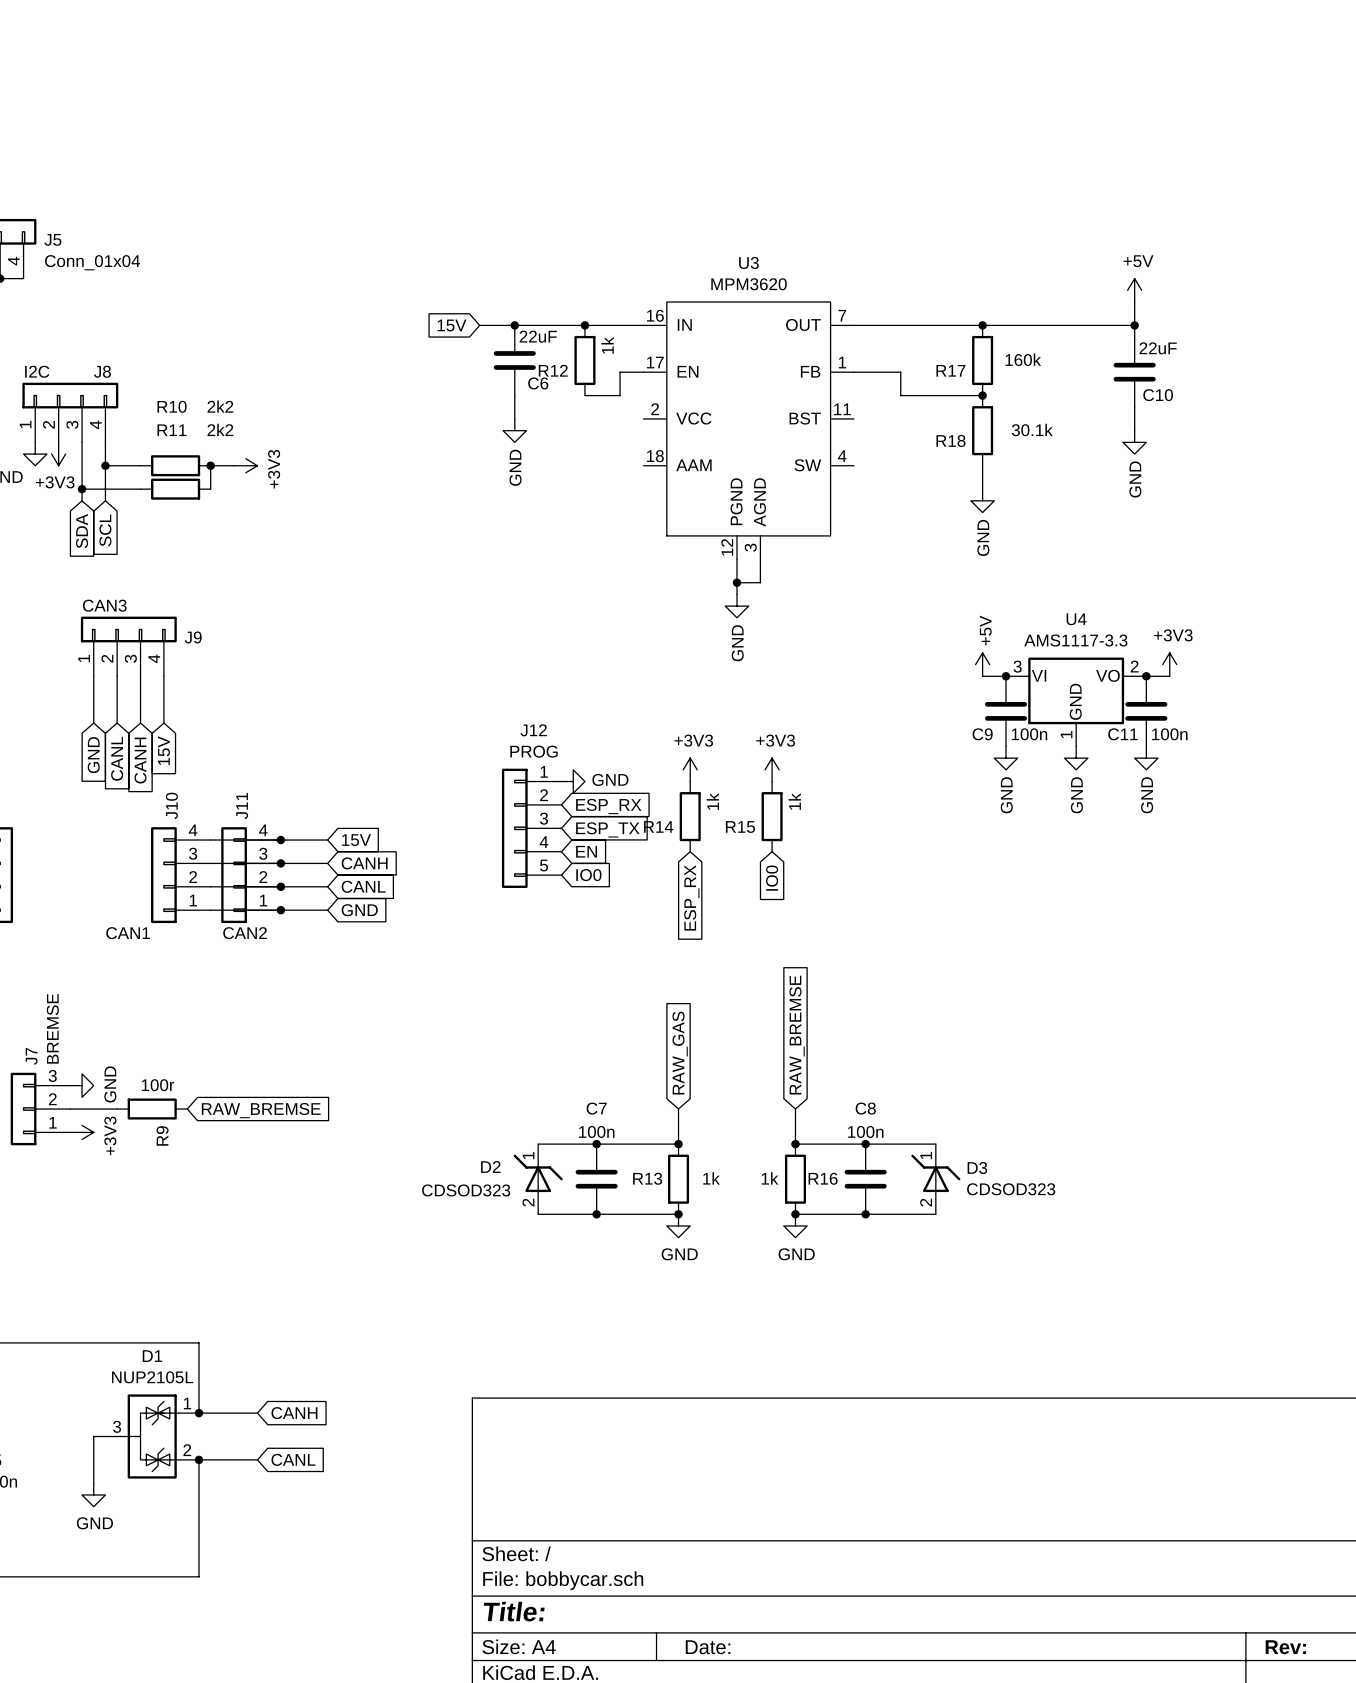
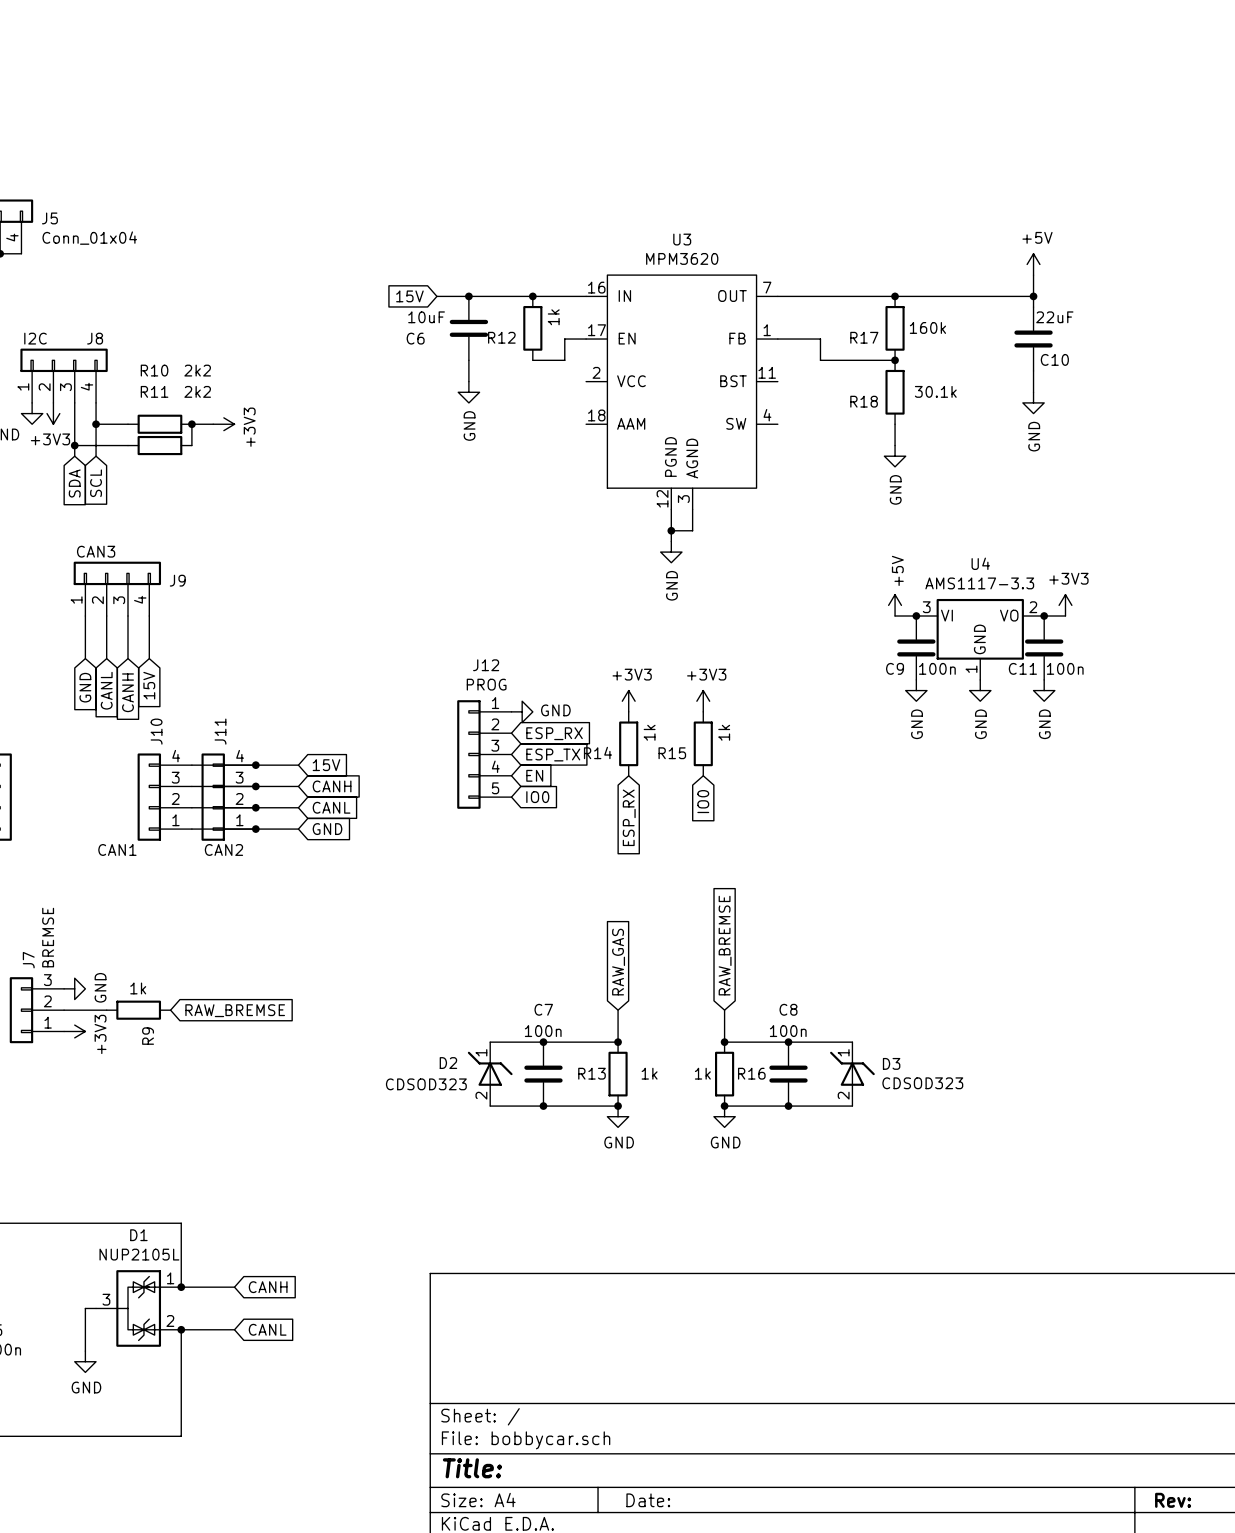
C6 value: 22uF (538, 336) -> 10uF (426, 317)
C6 name position: C6 (538, 383) -> C6 (415, 338)
R9 value: 100r (158, 1085) -> 1k (138, 988)

